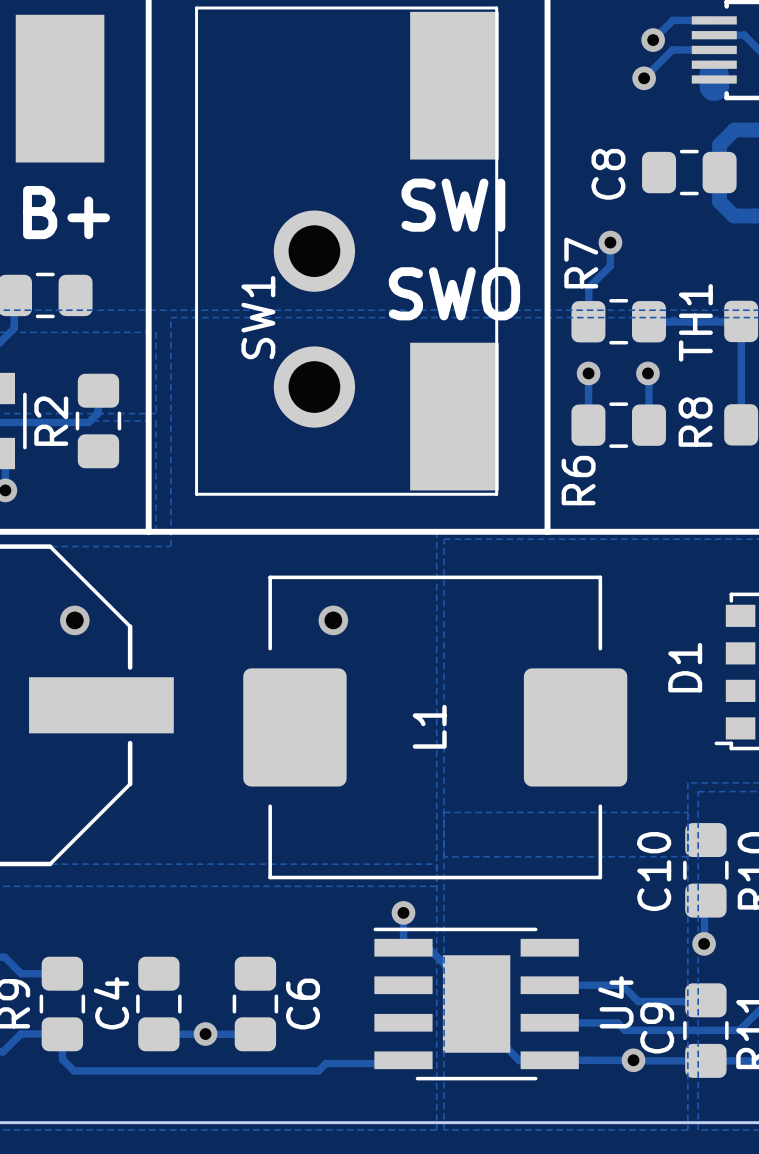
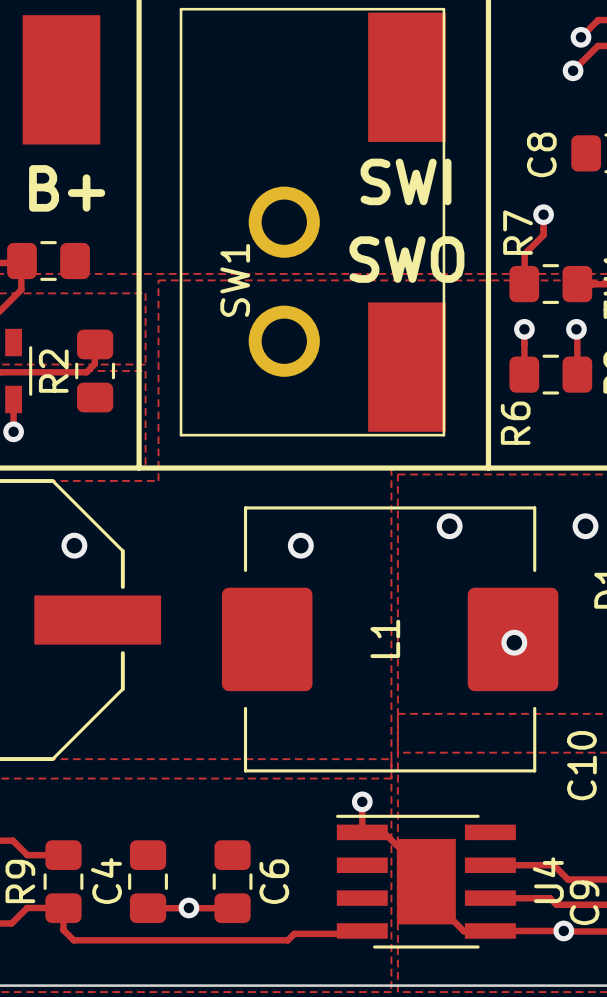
via: none -> (449, 526)
via: none -> (585, 526)
via: none -> (514, 642)

